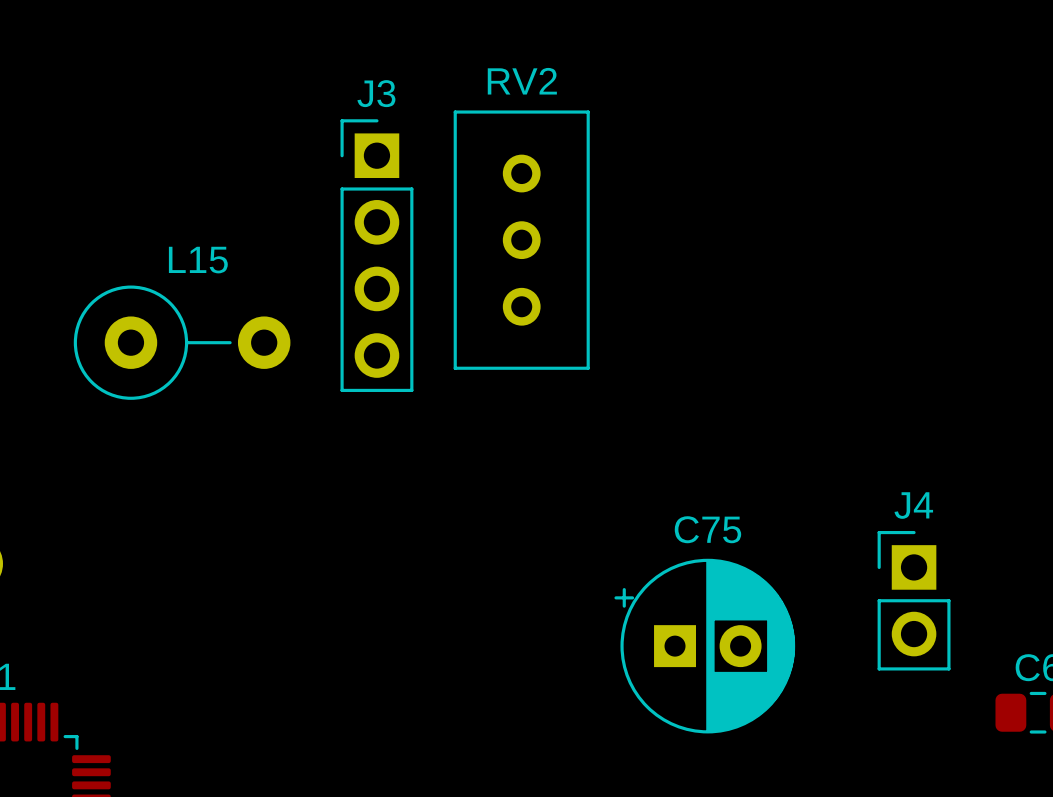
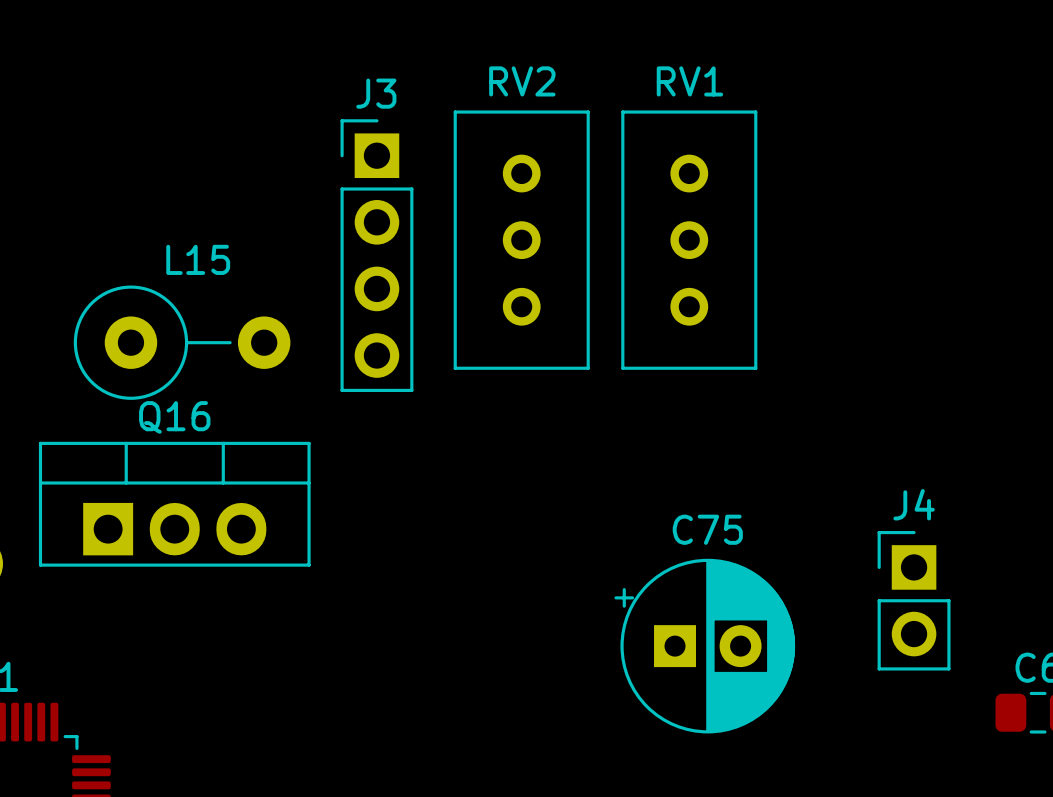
RV1: none -> (689, 240)
Q16: none -> (174, 504)

